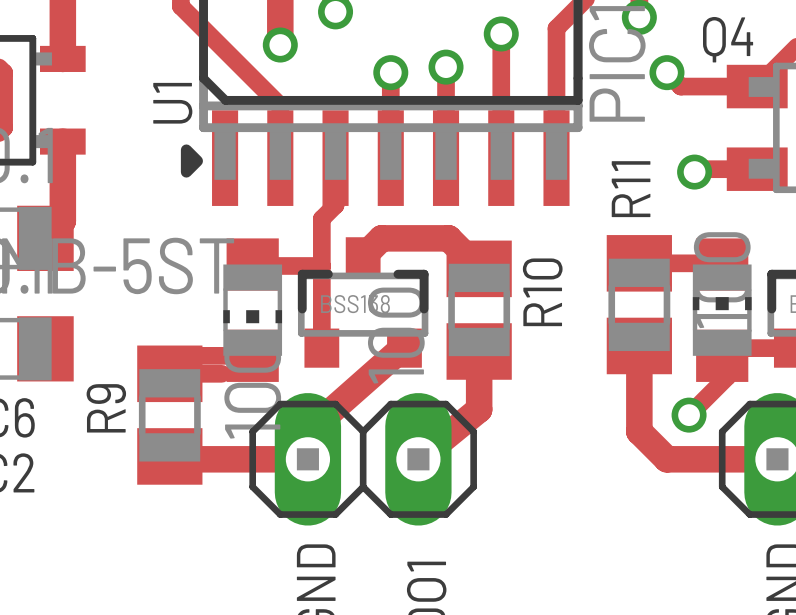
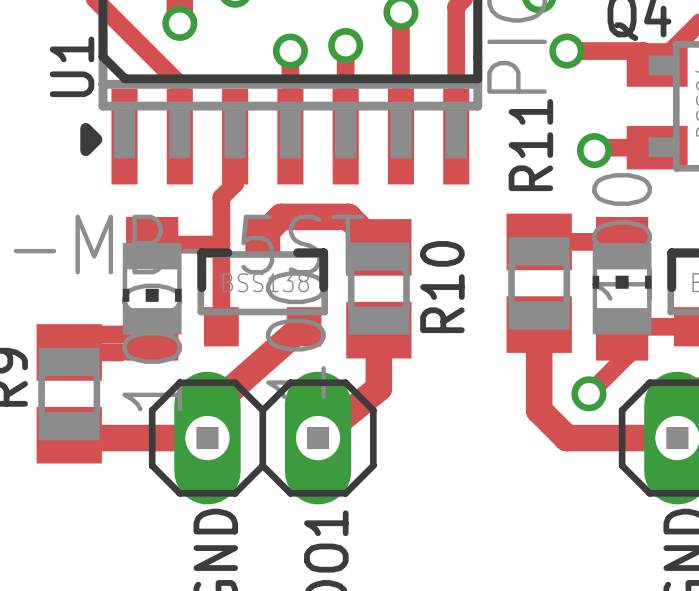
track: (666, 72) (680, 86) (757, 86) -> (566, 51) (643, 51) (657, 64)

